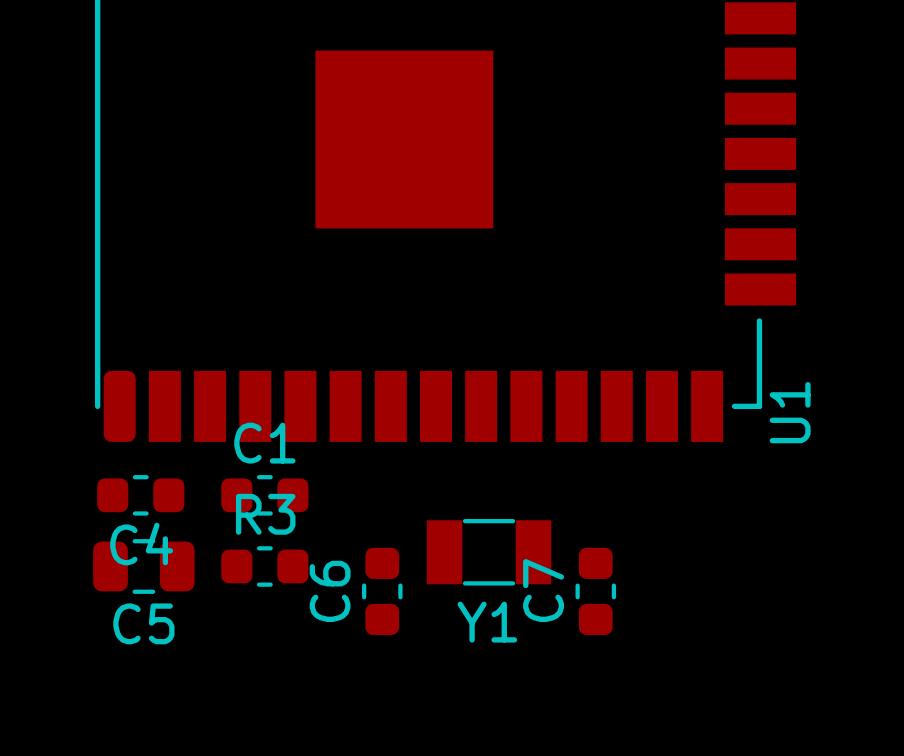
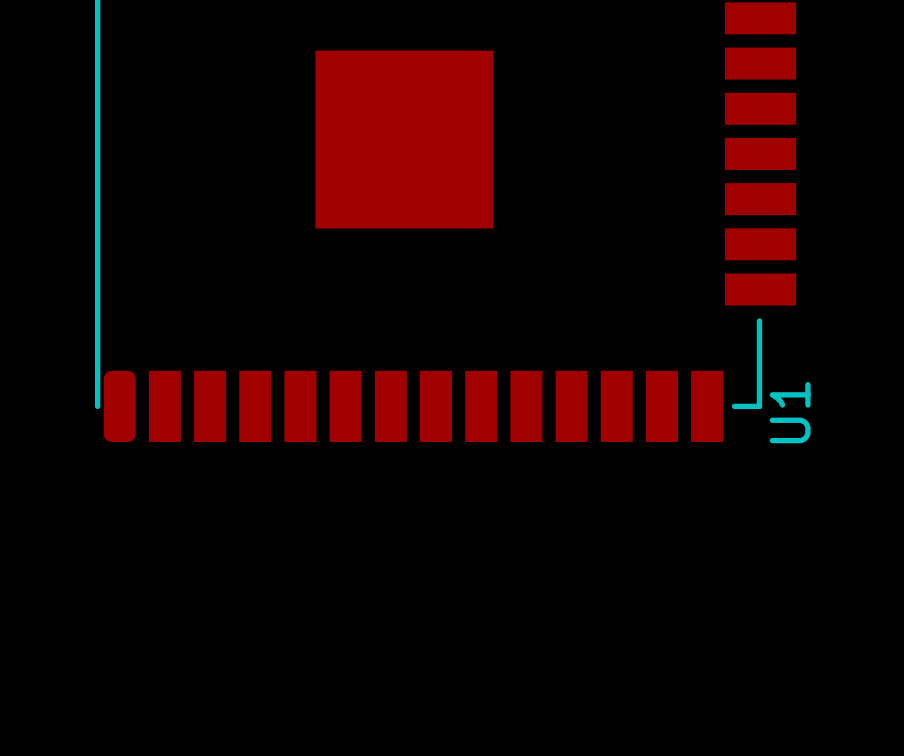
C4: (140, 495) -> none
C1: (264, 495) -> none
Y1: (489, 552) -> none
C5: (143, 566) -> none
R3: (264, 566) -> none
C6: (382, 591) -> none
C7: (595, 591) -> none

